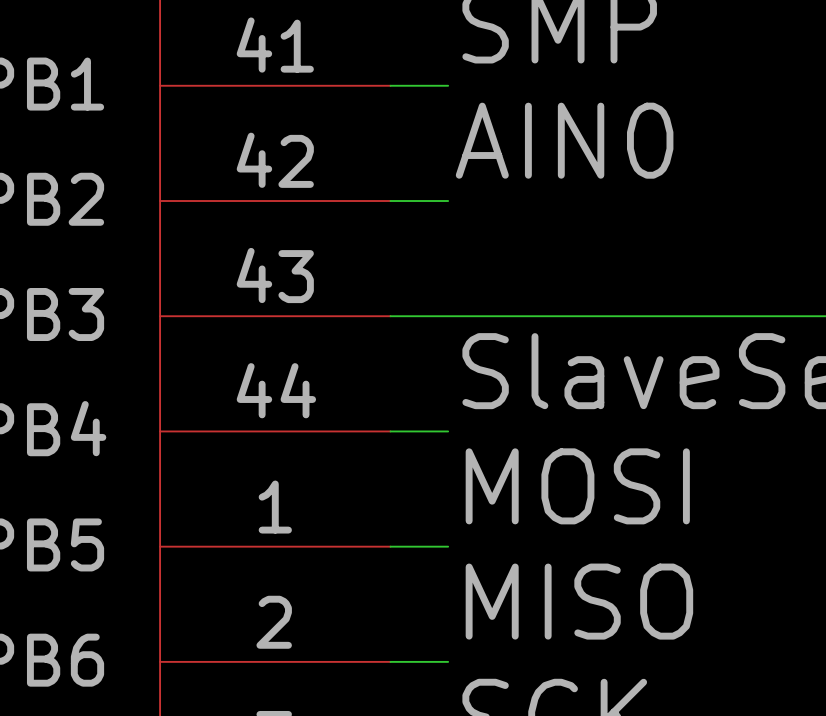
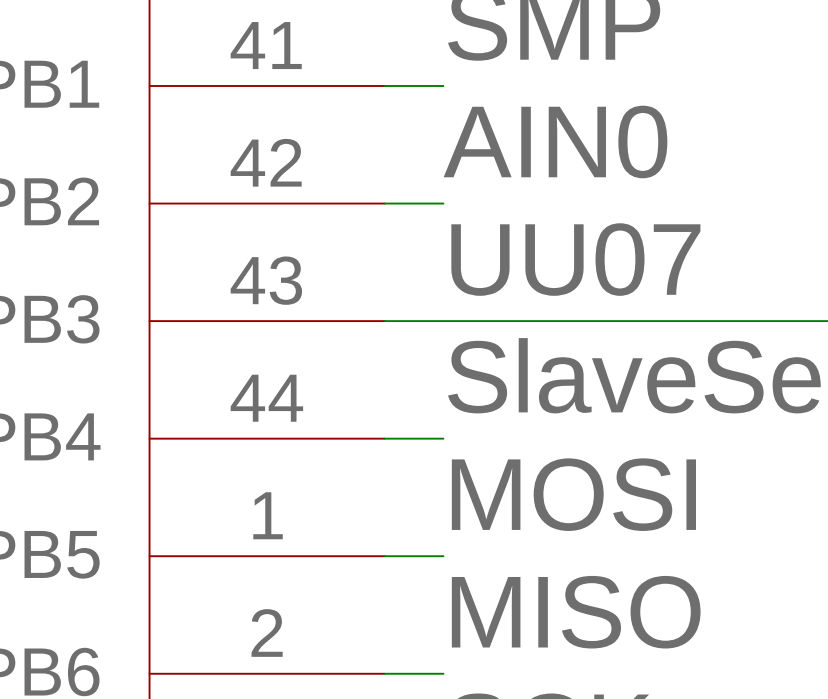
label: none -> UU07 (575, 259)

